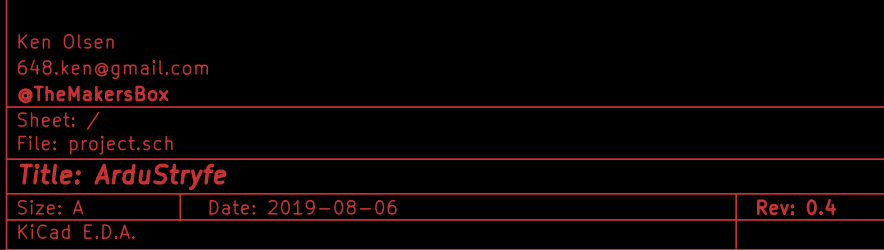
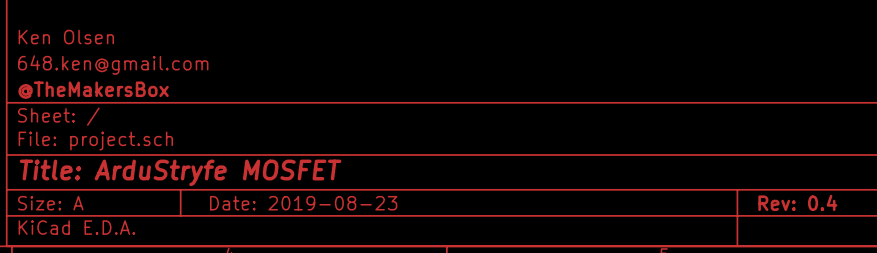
title block: Title: ArduStryfe (123, 177) -> Title: ArduStryfe MOSFET (180, 172)
title block: Date: 2019-08-06 (303, 207) -> Date: 2019-08-23 (303, 203)

